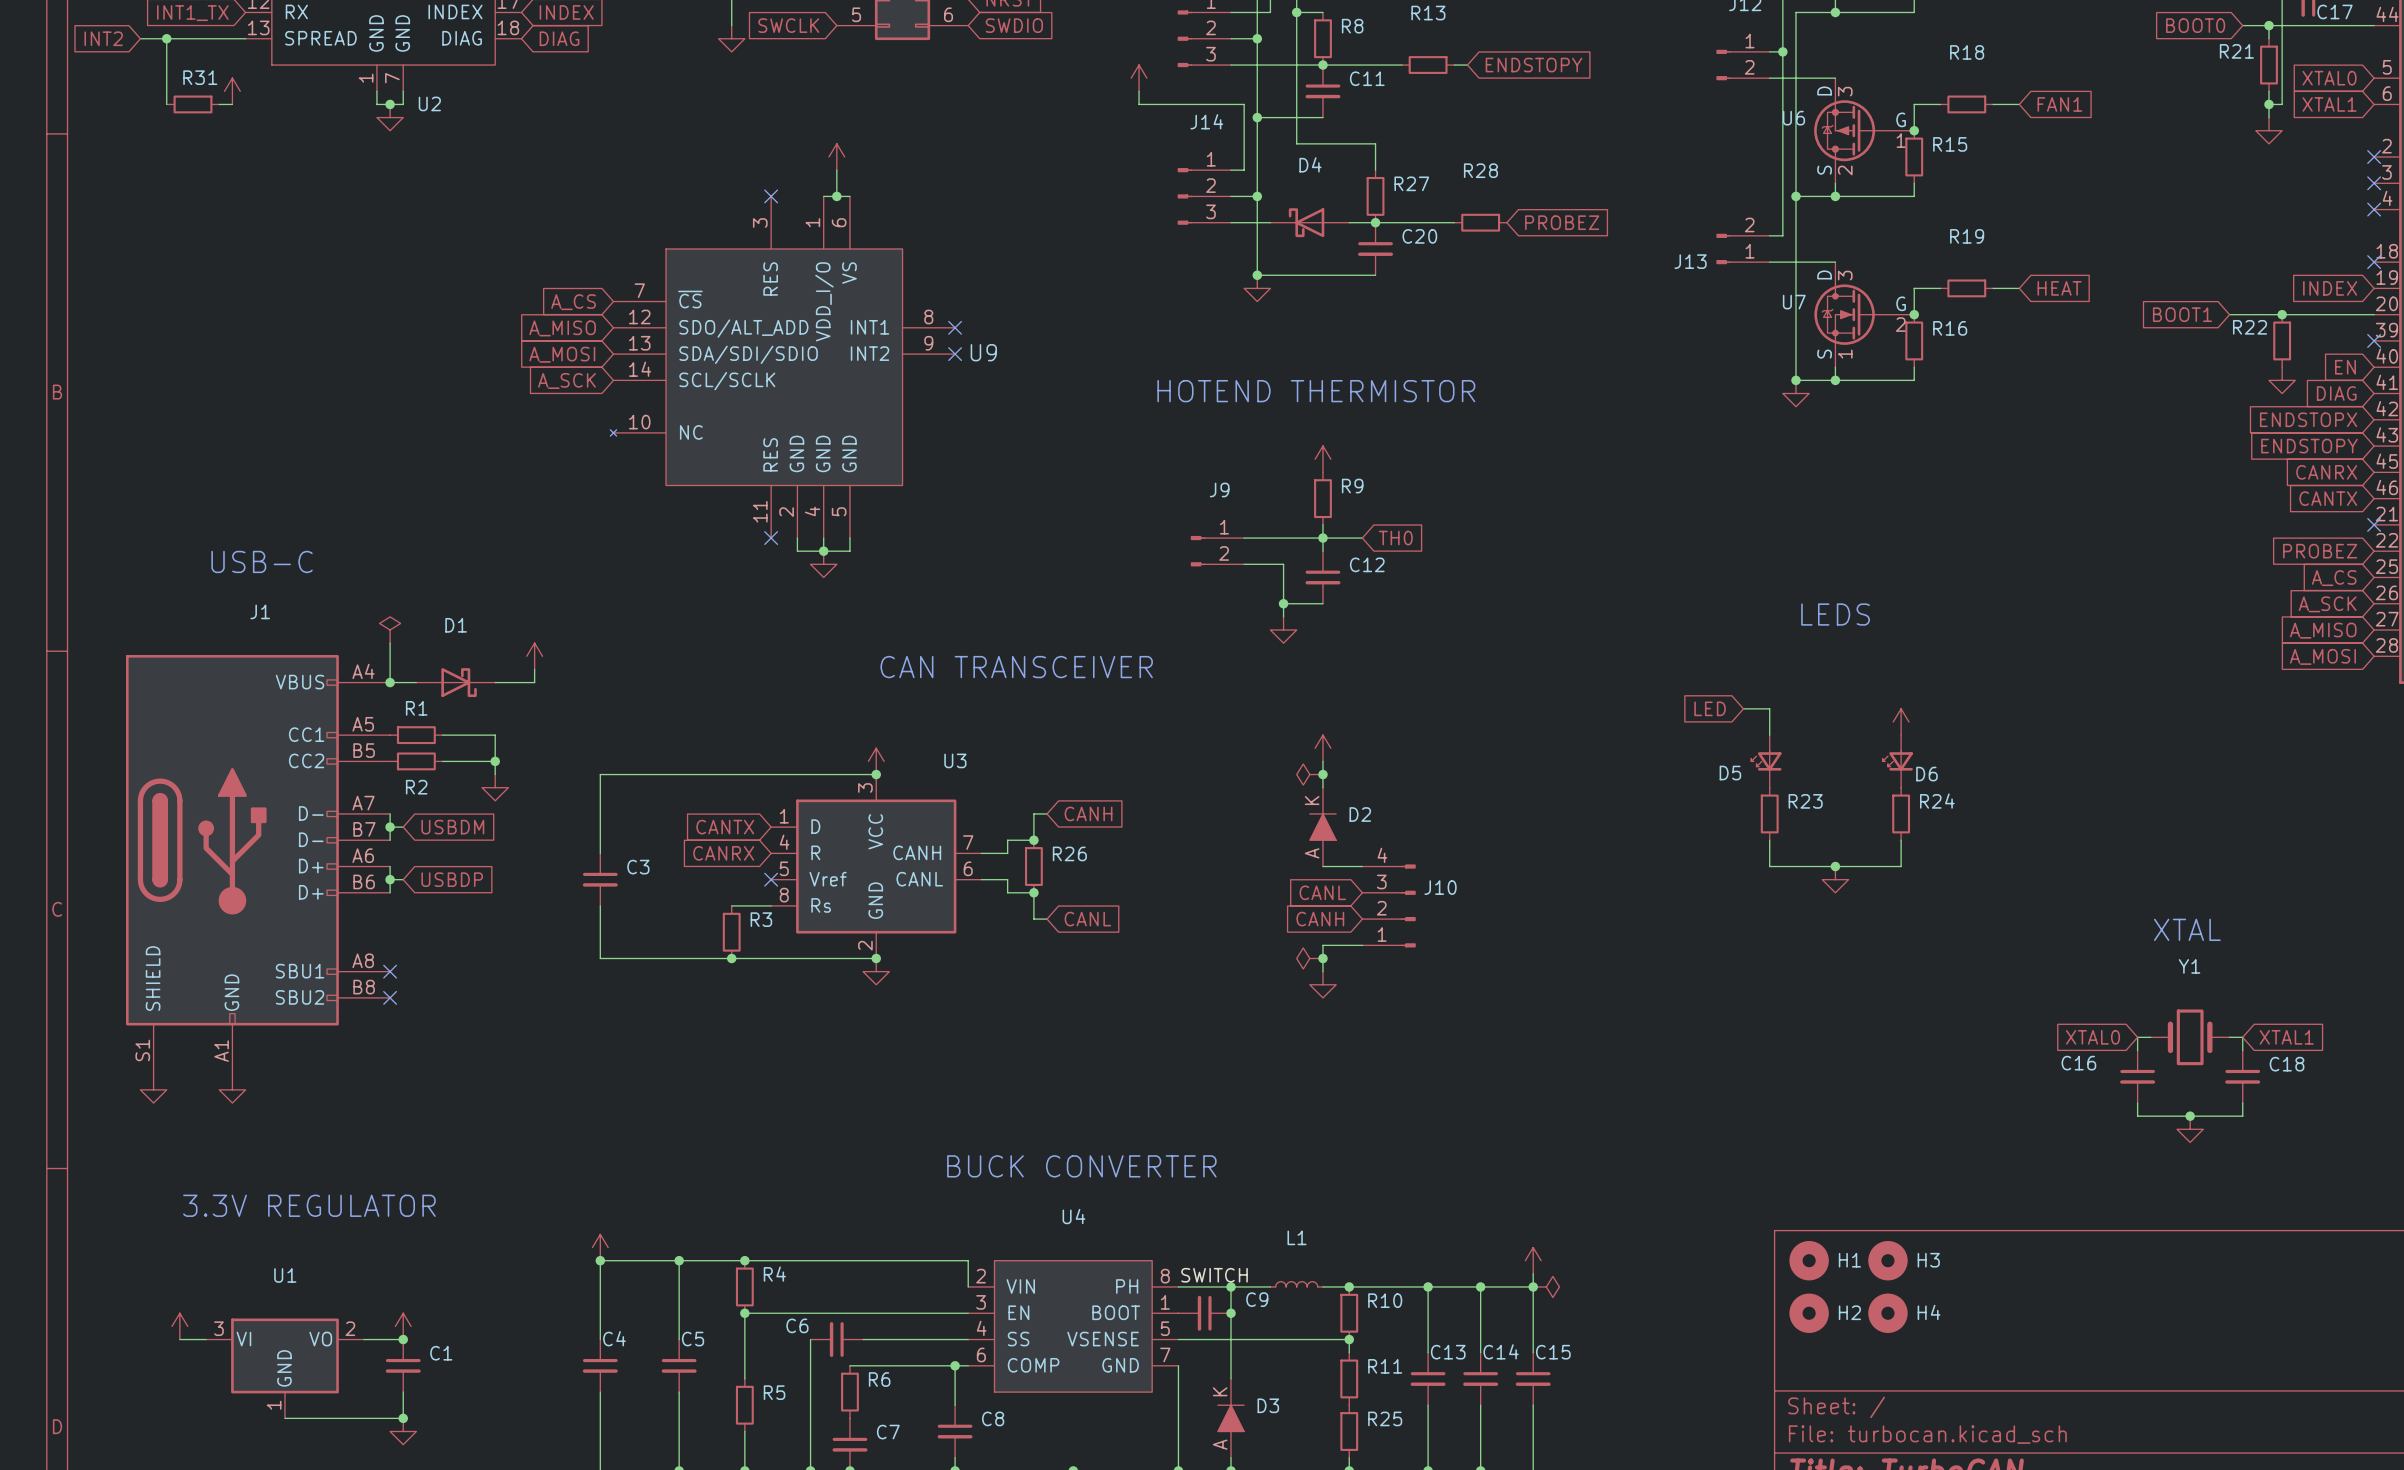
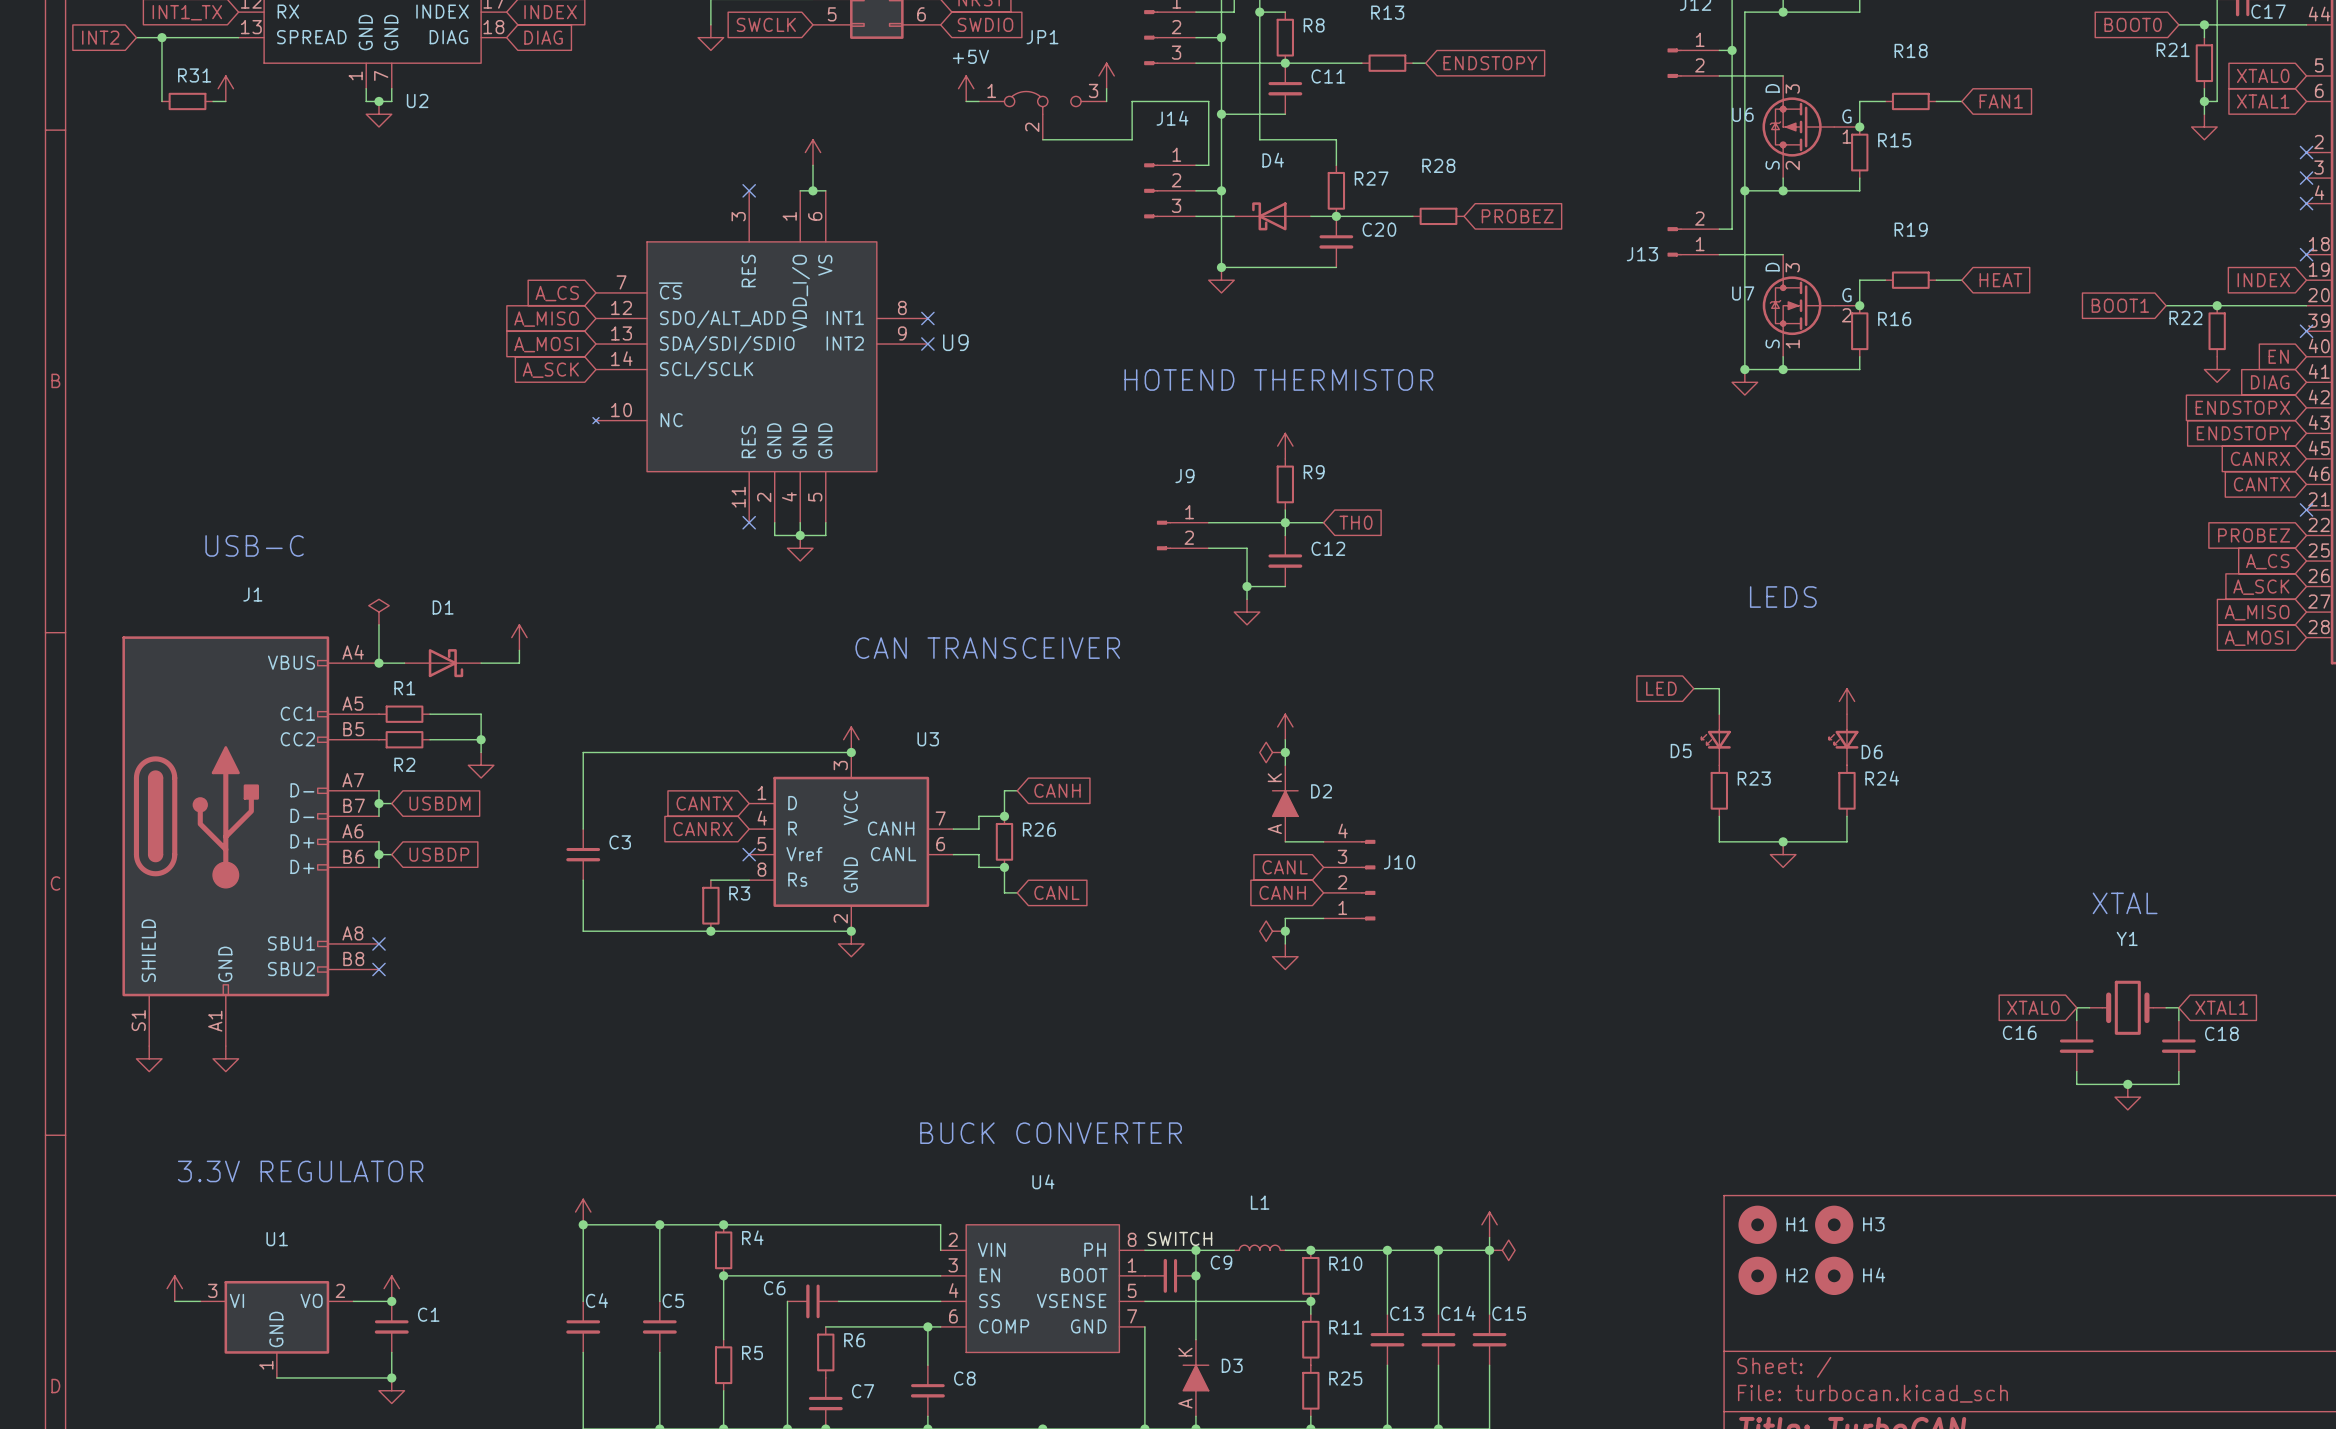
power symbol: none -> +5V (966, 88)
wire: none -> (966, 101) (978, 101)
wire: (1139, 104) (1165, 104) -> (1042, 139) (1132, 139) (1132, 101)
JP1: none -> (1042, 115)

